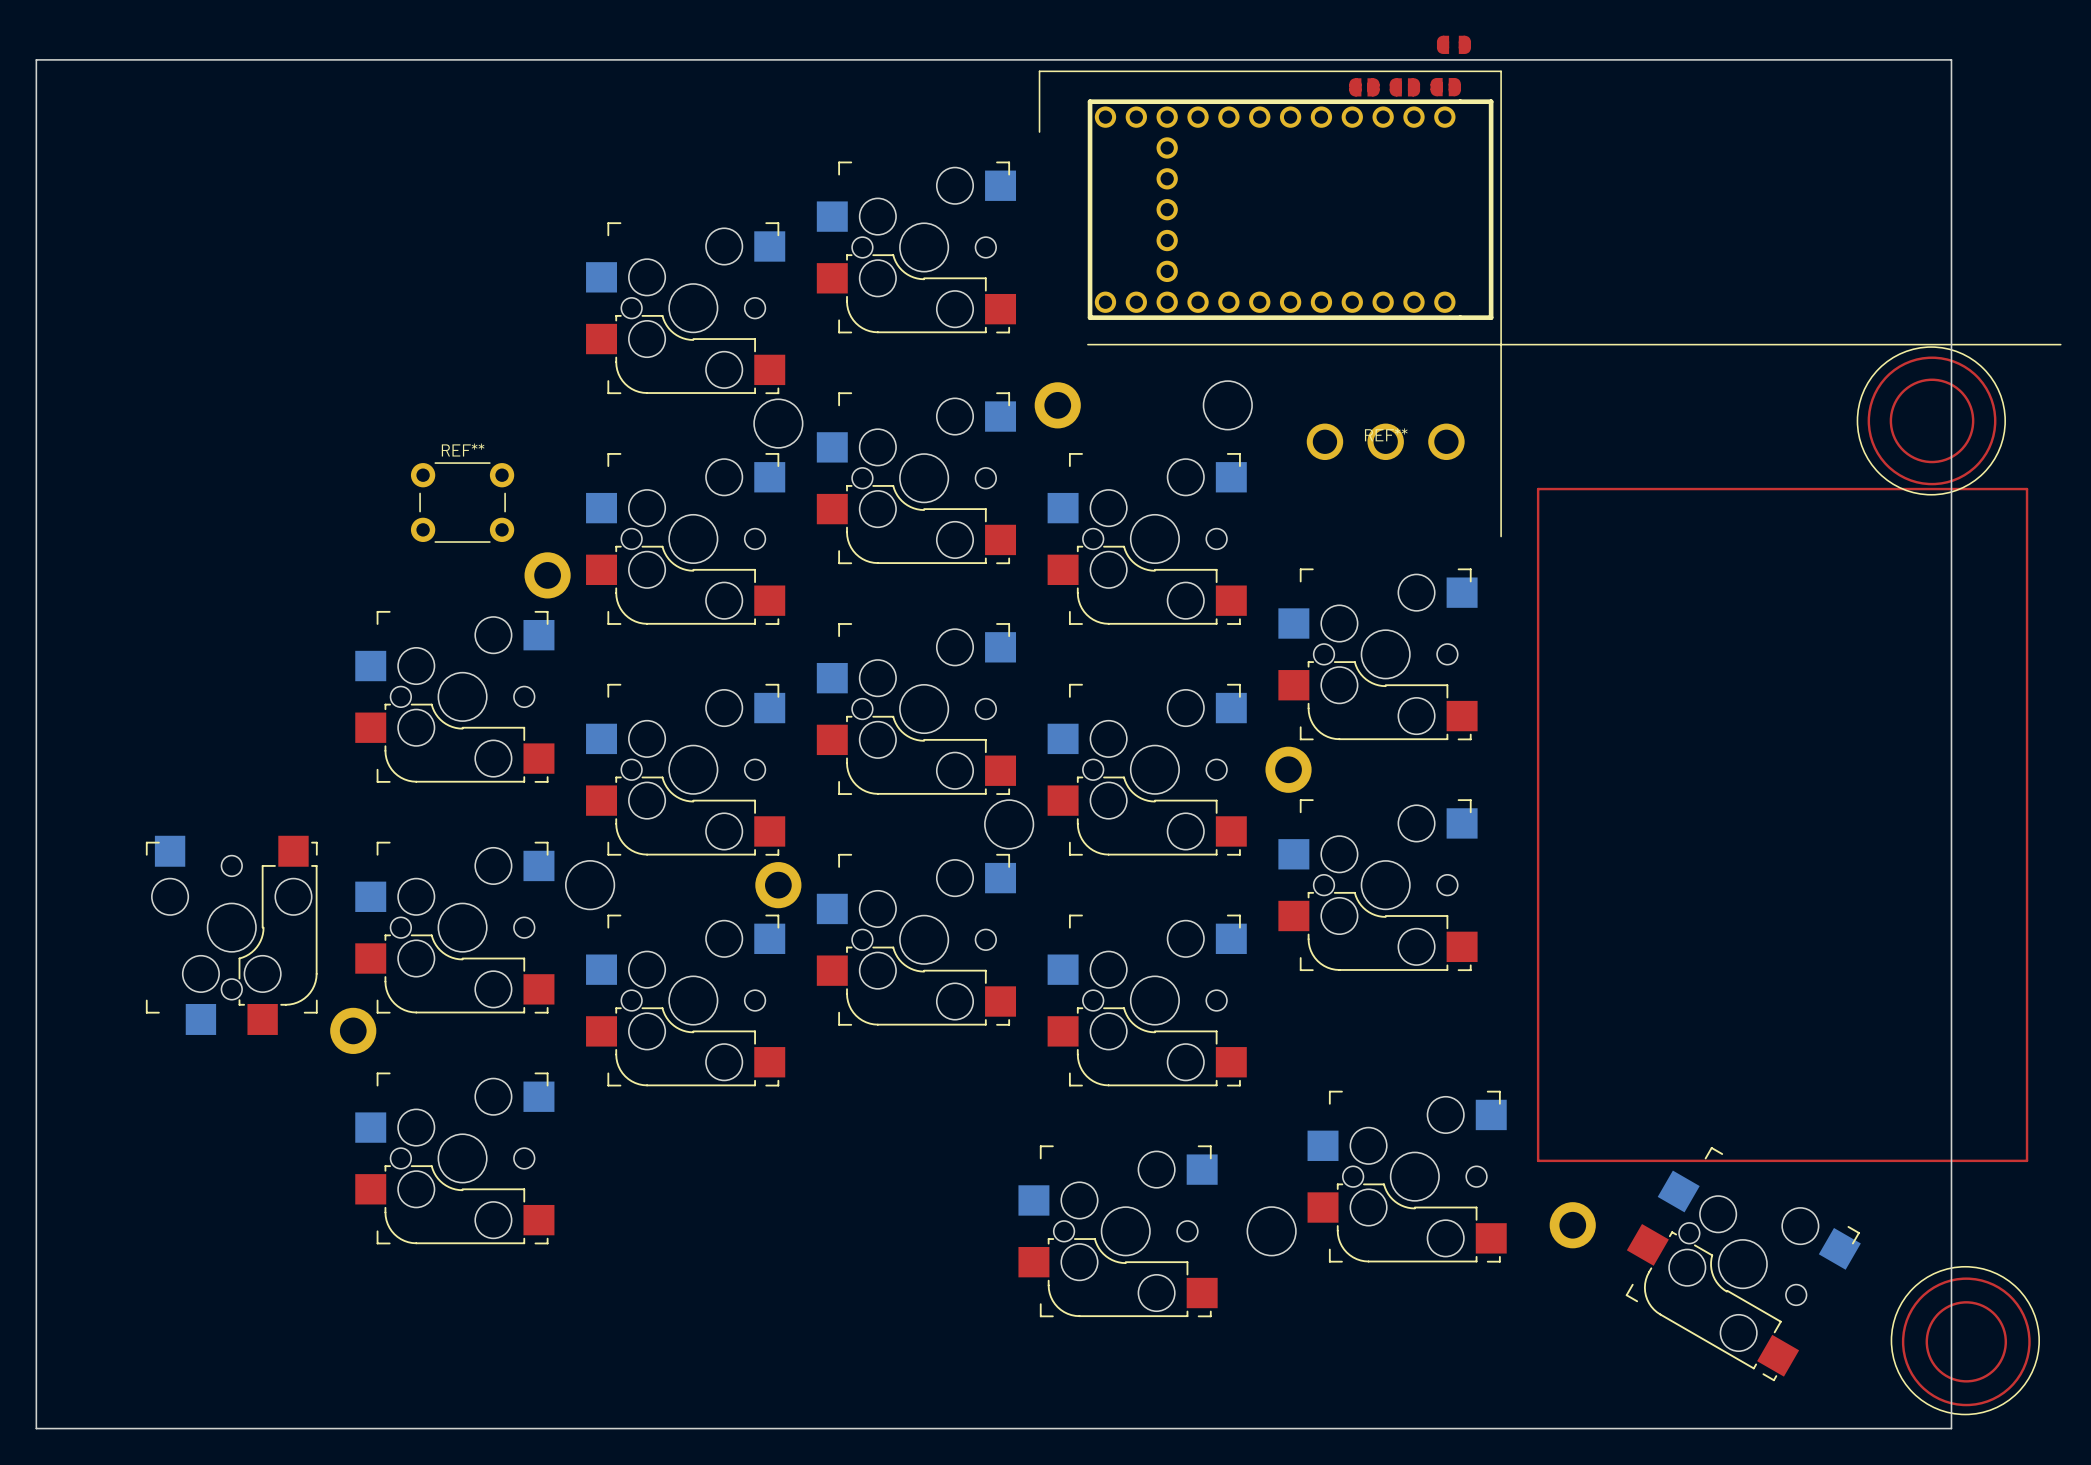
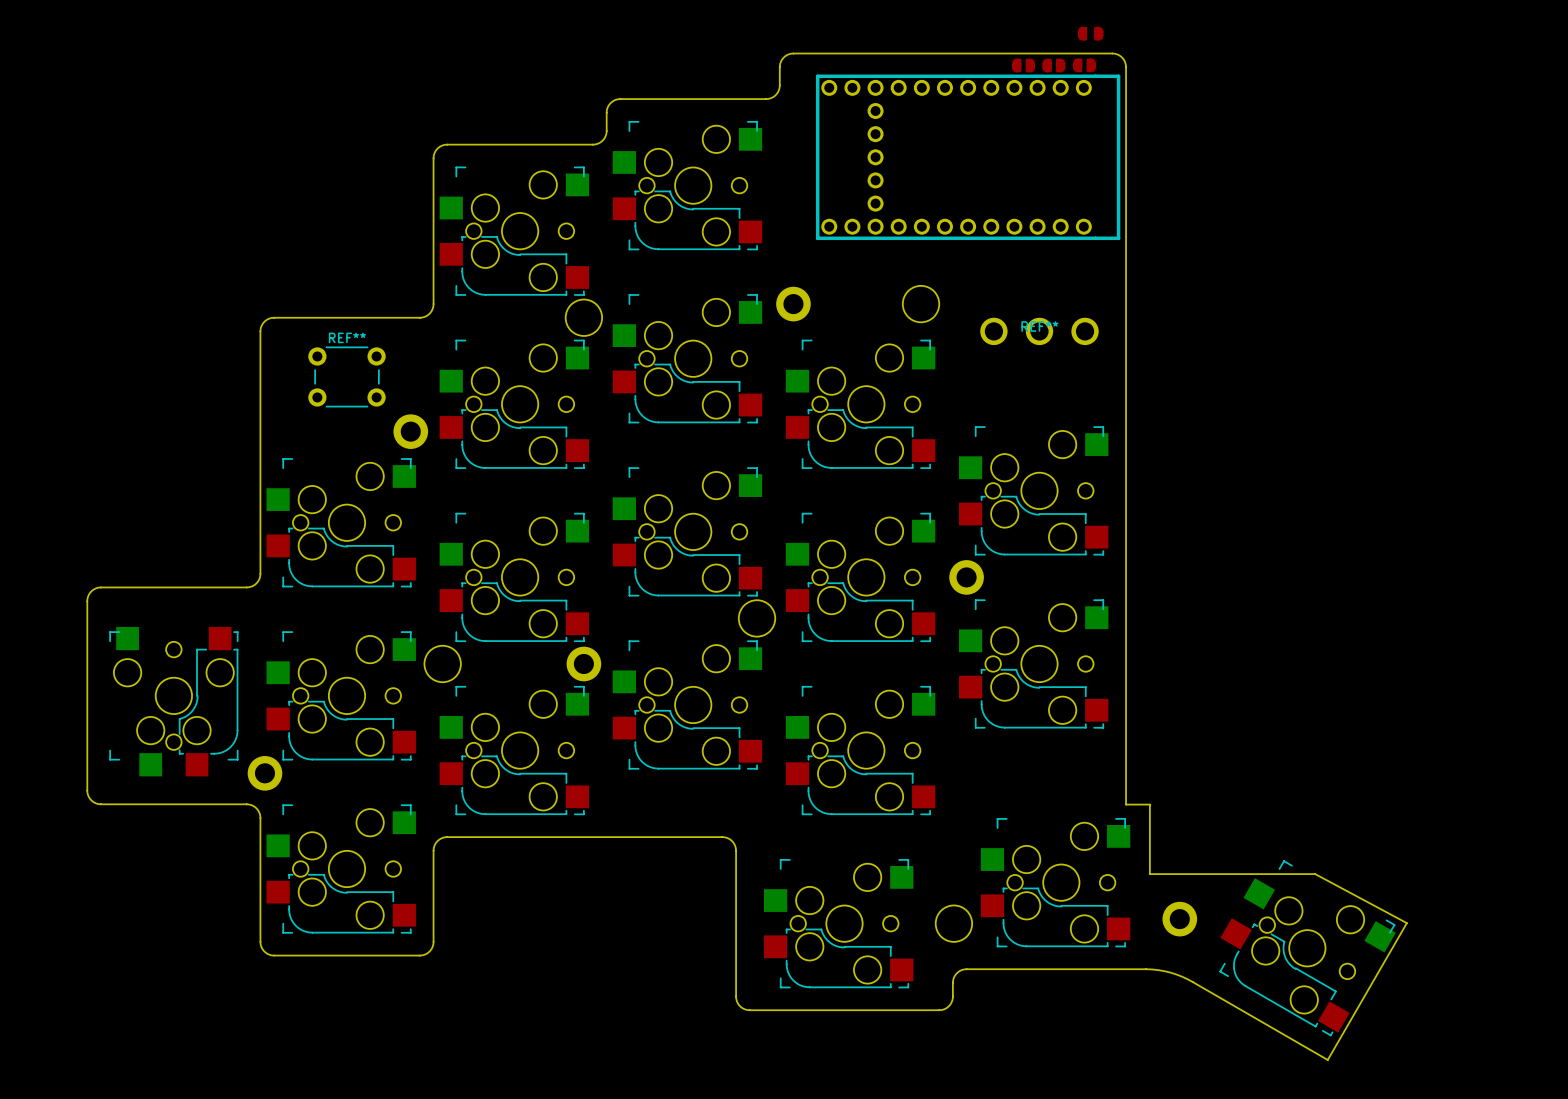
board edge: (36, 59) (1951, 59) (1951, 1428) (36, 1428) (36, 59) -> none
board edge: none -> (1112, 53) (791, 53) (785, 56) (780, 61) (779, 88) (775, 95) (769, 98) (618, 99) (612, 101) (607, 107) (606, 134) (602, 140) (596, 144) (447, 144) (440, 146) (435, 151) (433, 158) (433, 304) (429, 313) (419, 317) (272, 317) (265, 320) (261, 326) (260, 573) (257, 582) (246, 587) (99, 587) (91, 591) (87, 601)
board edge: none -> (1112, 53) (1122, 57) (1126, 67) (1126, 804) (1149, 804) (1149, 874) (1315, 874) (1406, 923) (1327, 1059) (1187, 979) (1170, 972) (1152, 969) (964, 969) (954, 976) (951, 1001) (947, 1007) (941, 1010) (744, 1009) (738, 1004) (736, 996) (735, 848) (732, 841) (724, 837) (443, 837) (437, 841) (433, 849) (433, 943) (427, 953) (419, 955) (269, 954) (263, 950) (260, 943) (260, 817) (255, 807) (246, 804) (99, 804) (92, 801) (88, 796) (87, 601)
line: (1039, 132) (1039, 71) (1501, 71) (1501, 536) -> none
line: (1087, 344) (2060, 344) -> none
drawing: [1856, 346, 2006, 496] -> none
top track: (1538, 489) (2027, 489) (2027, 1160) (1538, 1160) (1538, 489) -> none
drawing: [1890, 1266, 2040, 1416] -> none

